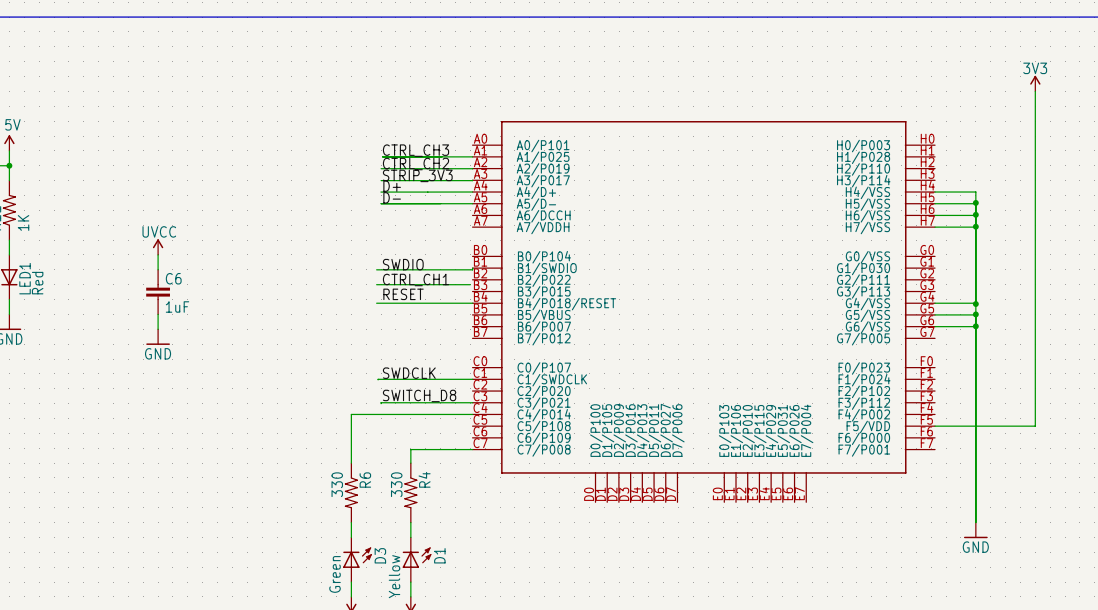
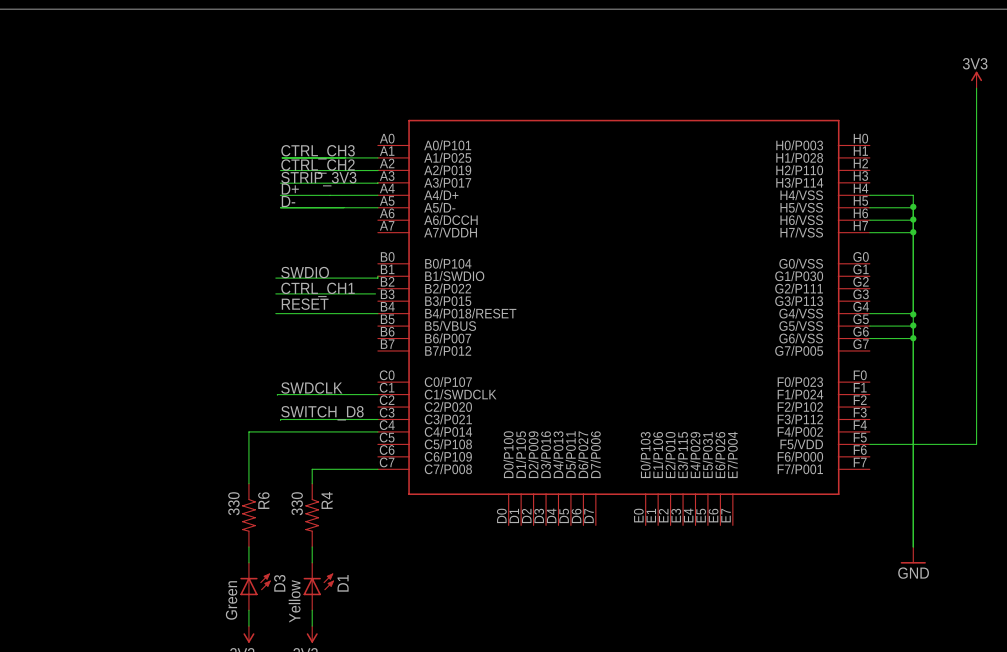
power symbol: UVCC (158, 247) -> none
wire: (158, 254) (158, 269) -> none
C6: 1uF (158, 292) -> none
wire: (158, 314) (158, 329) -> none
power symbol: GND (158, 337) -> none

